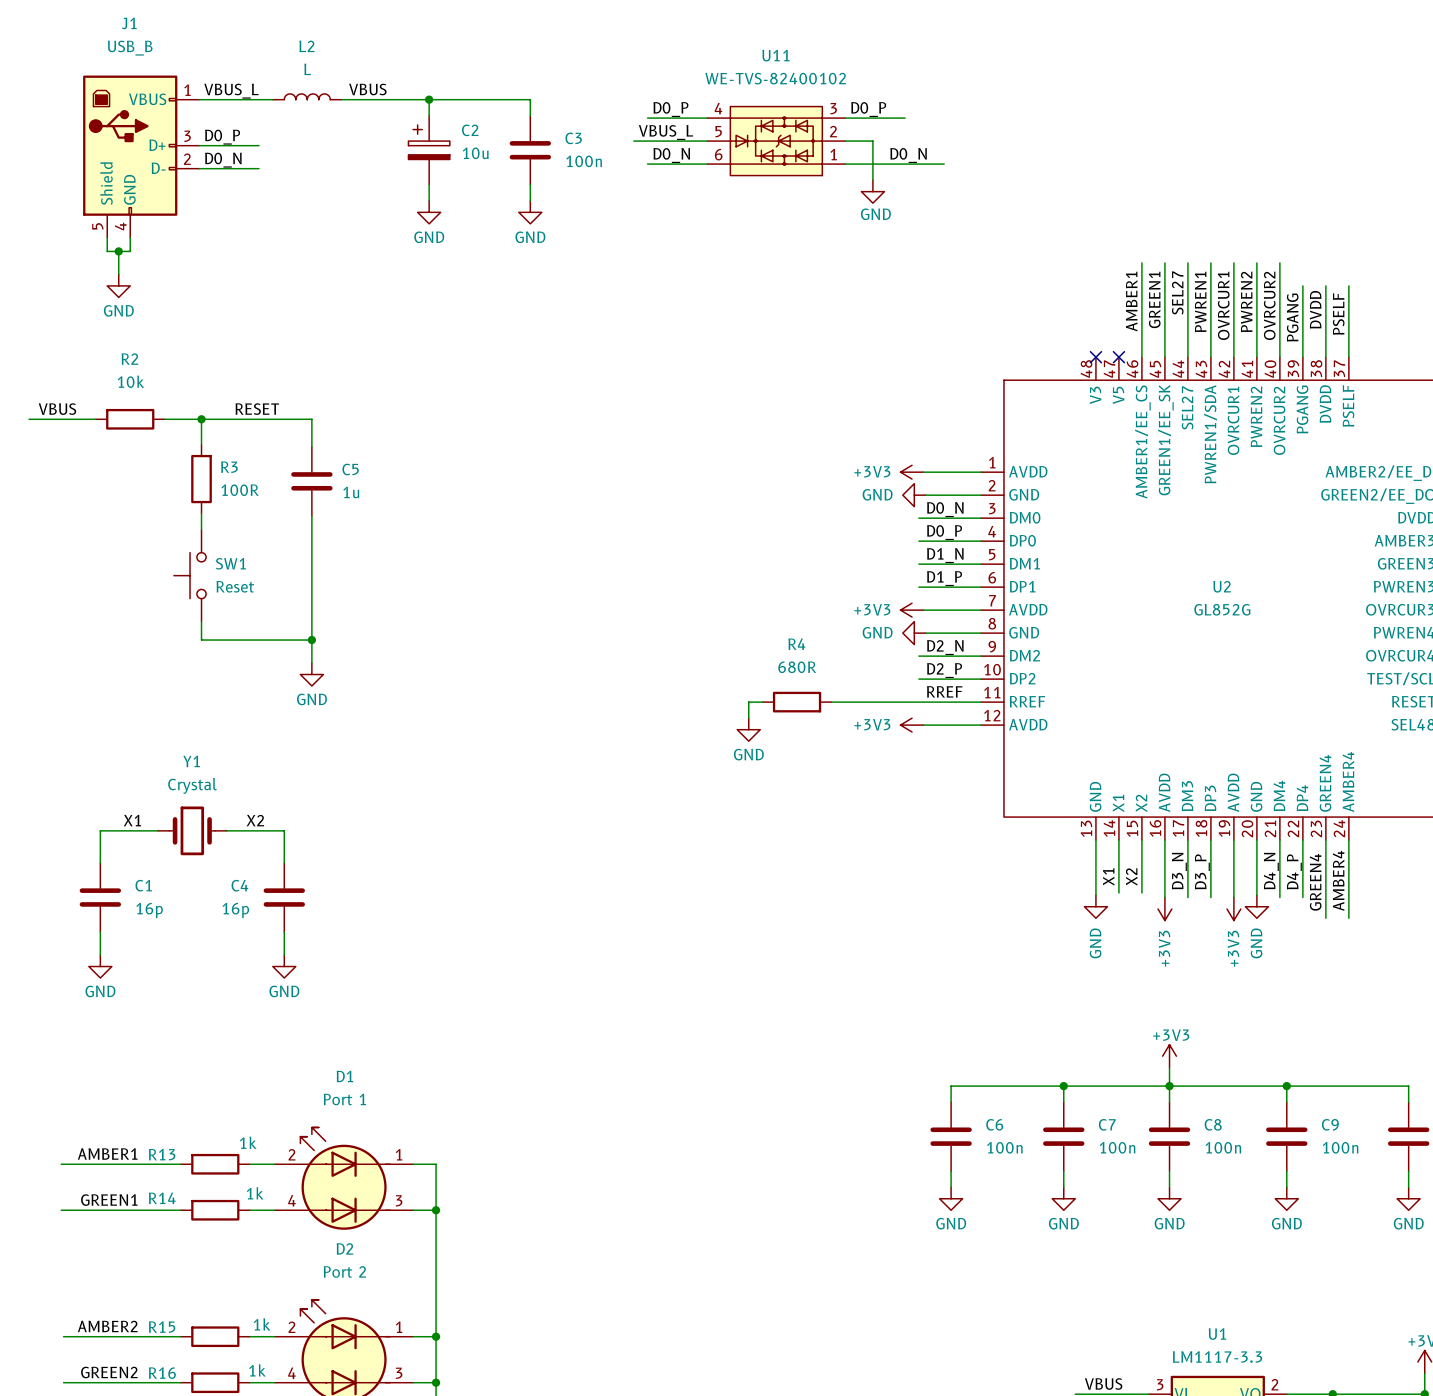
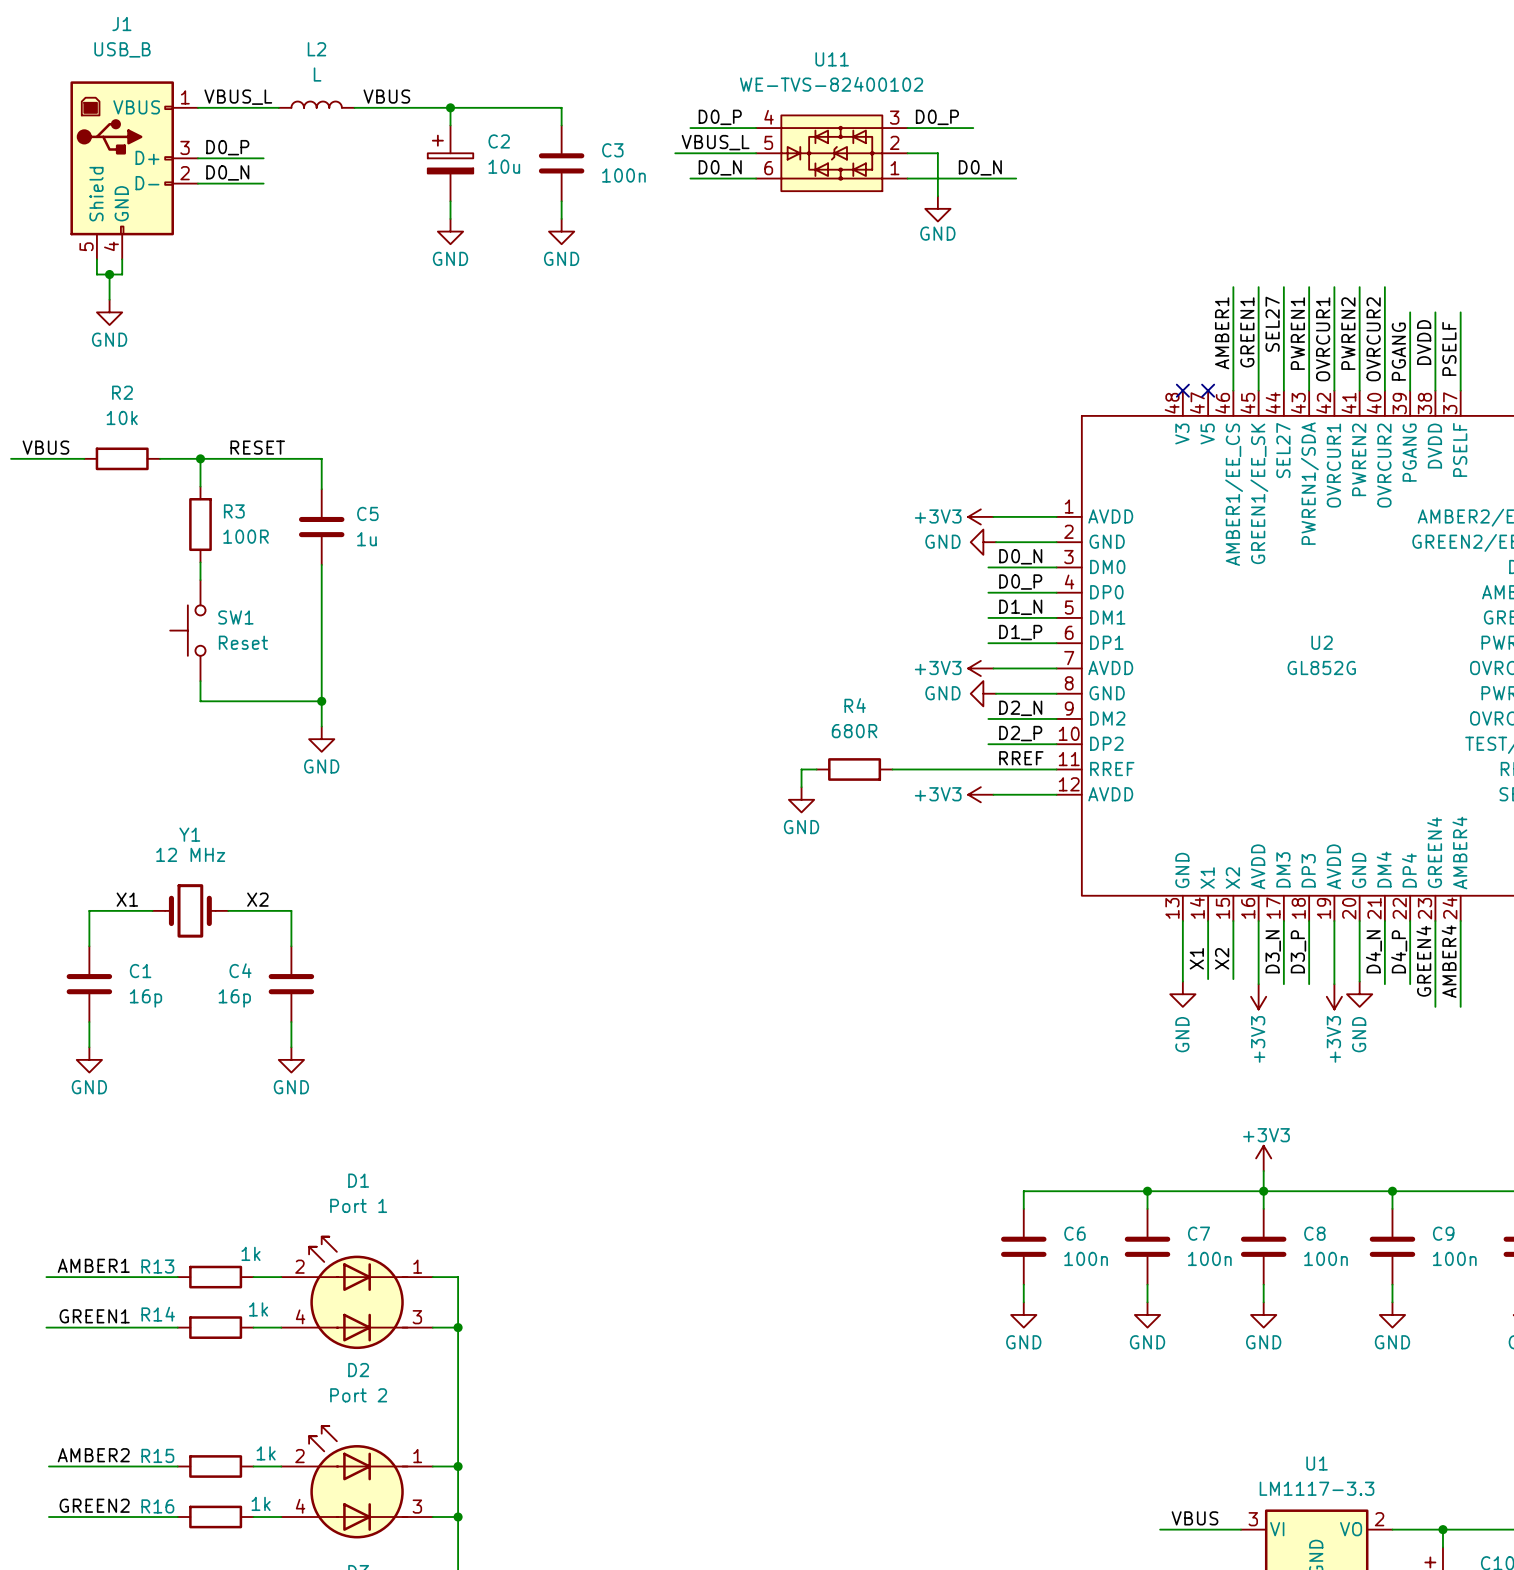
Y1 value: Crystal (192, 785) -> 12 MHz (190, 854)

